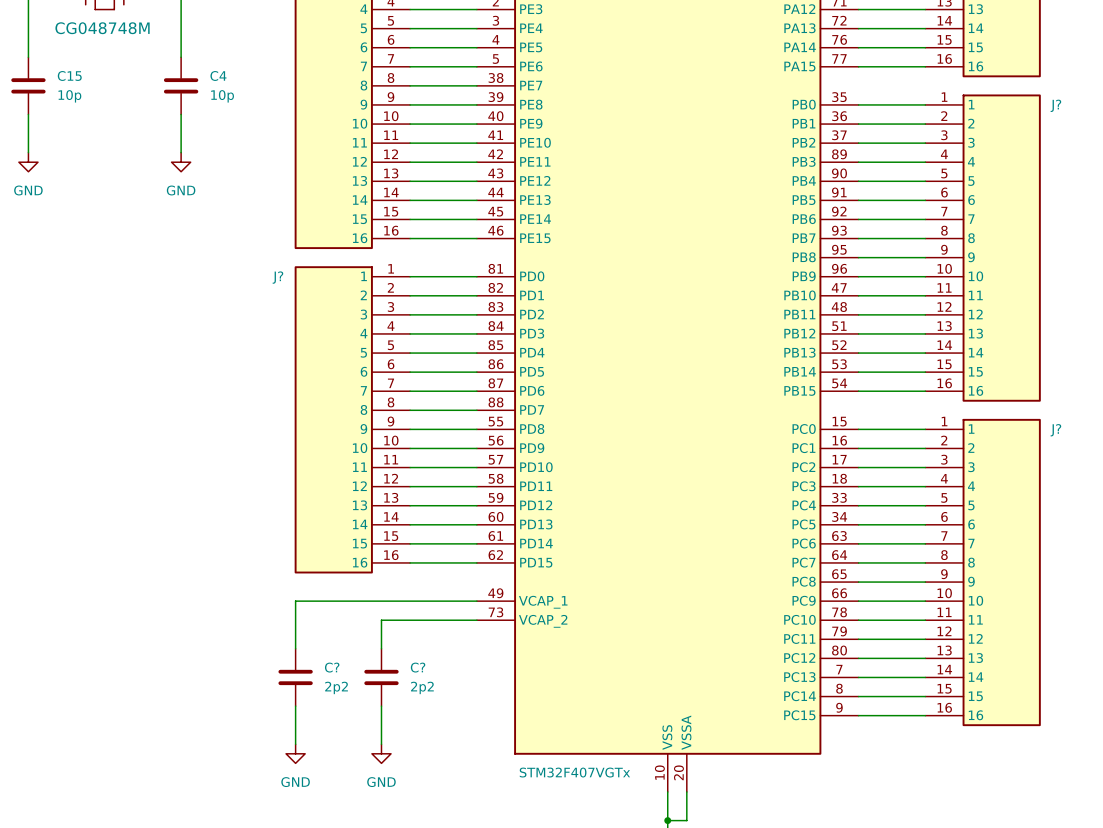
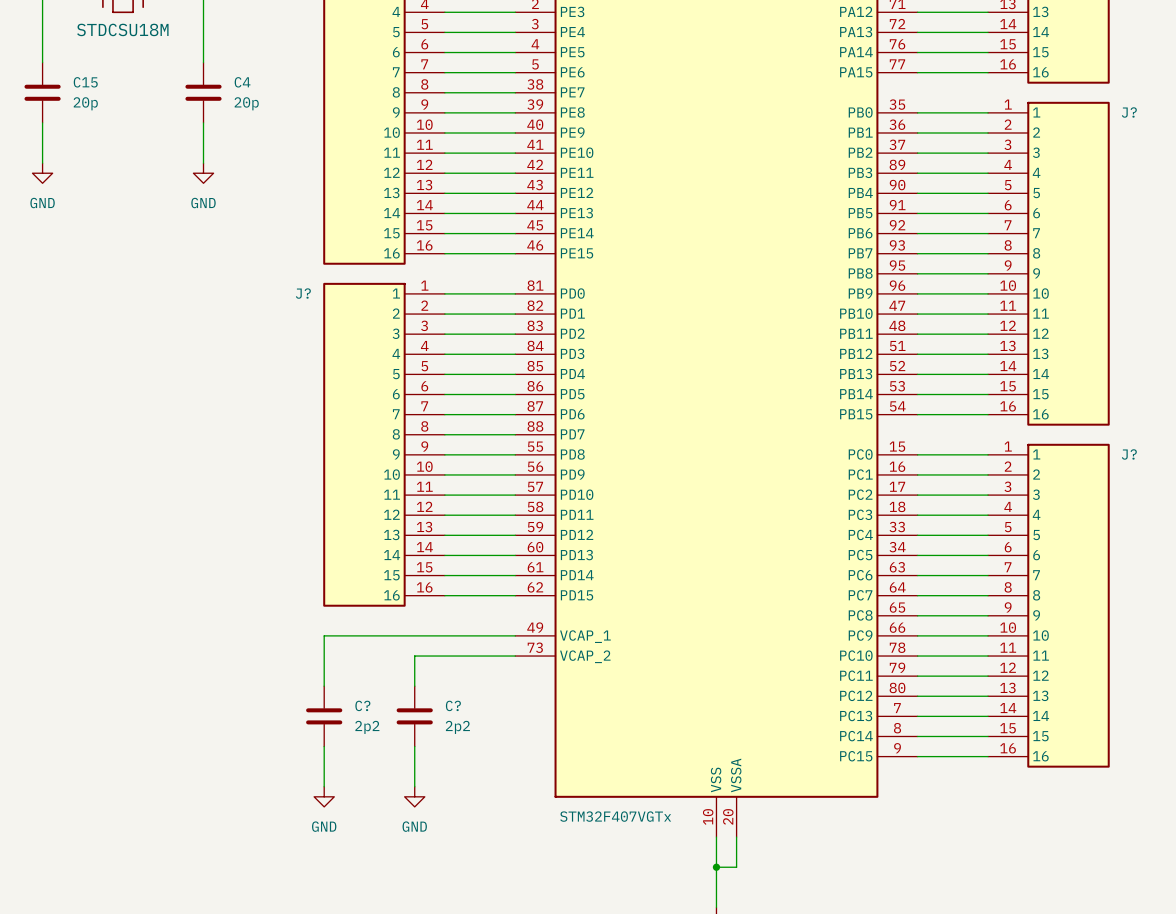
part value: CG048748M (102, 28) -> STDCSU18M (122, 29)
C15 value: 10p (69, 96) -> 20p (85, 103)
C4 value: 10p (222, 96) -> 20p (246, 103)

